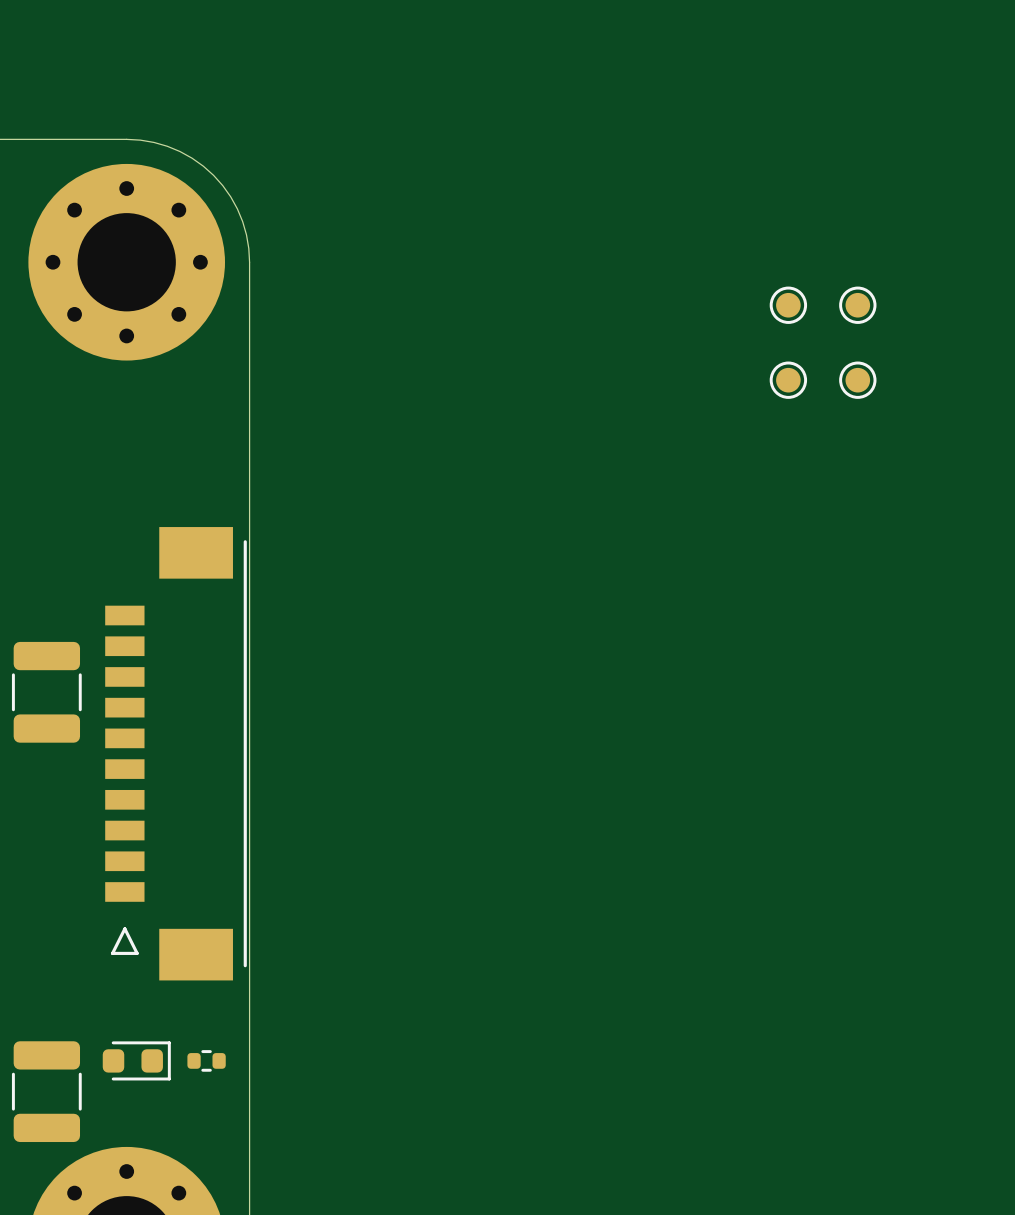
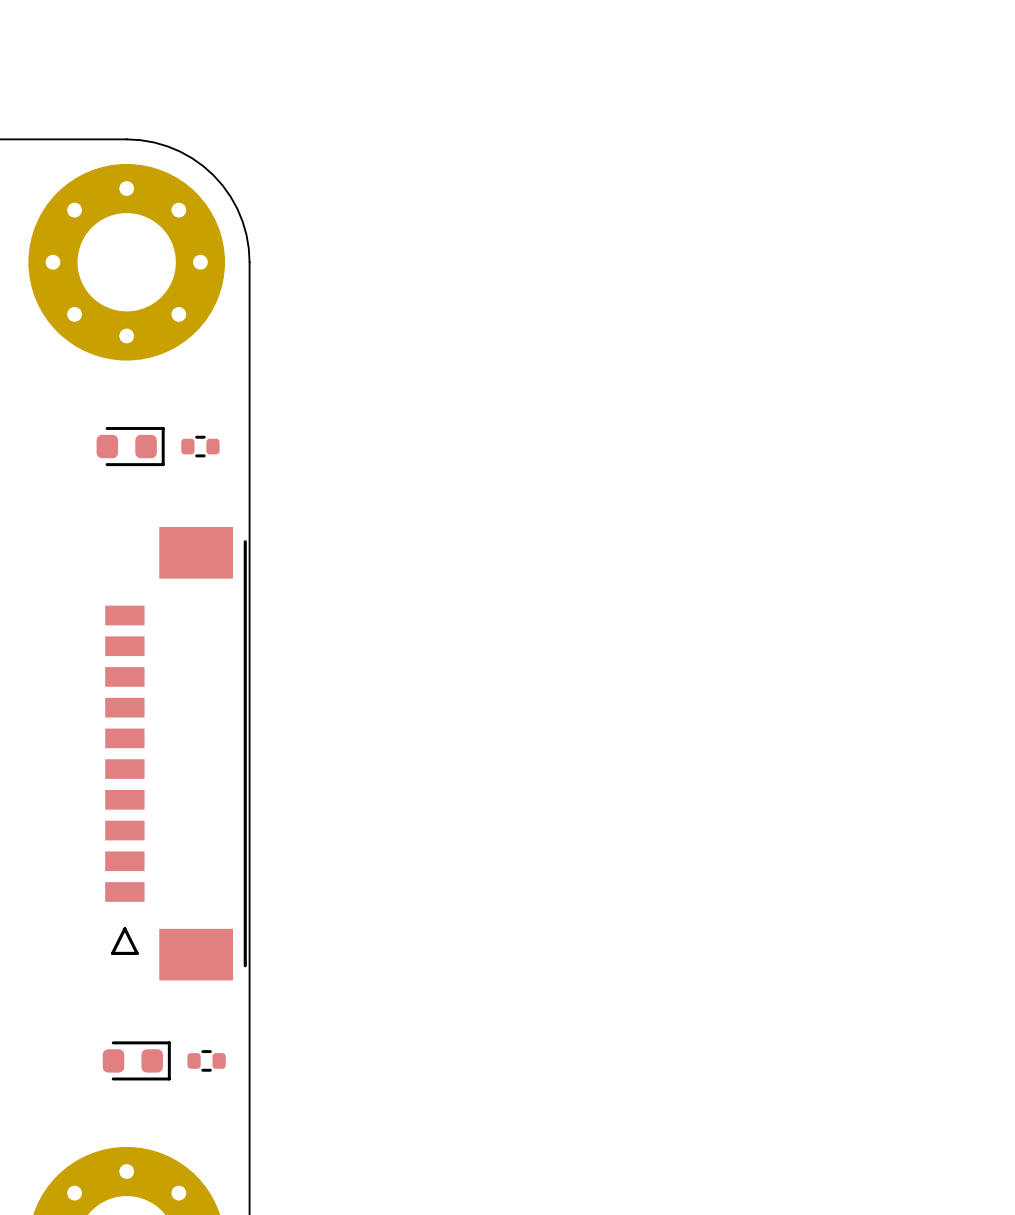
part: (788, 305) -> none
part: (857, 305) -> none
part: (788, 380) -> none
part: (857, 380) -> none
part: none -> (130, 446)
part: none -> (200, 446)
part: (46, 692) -> none
part: (46, 1091) -> none

